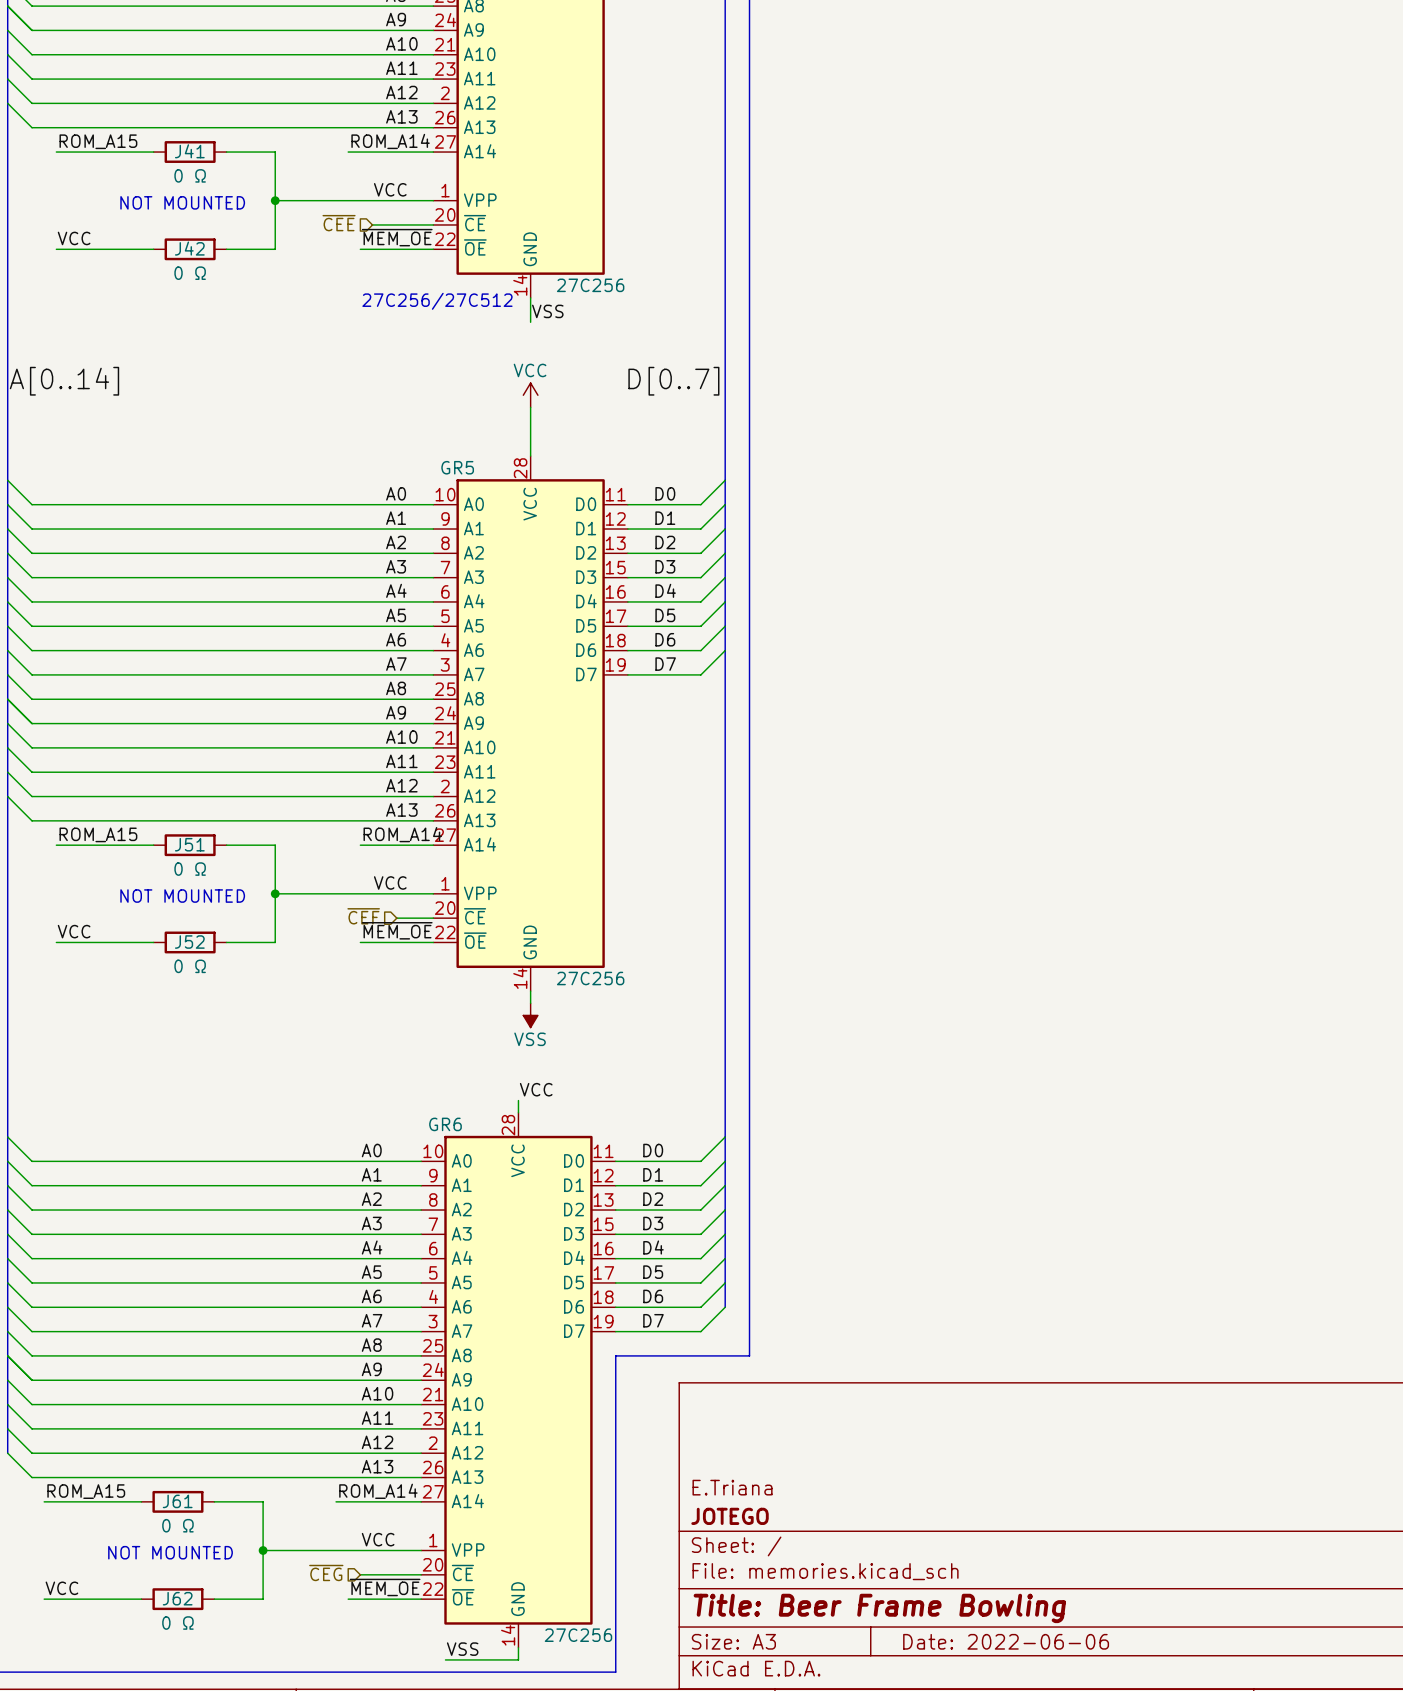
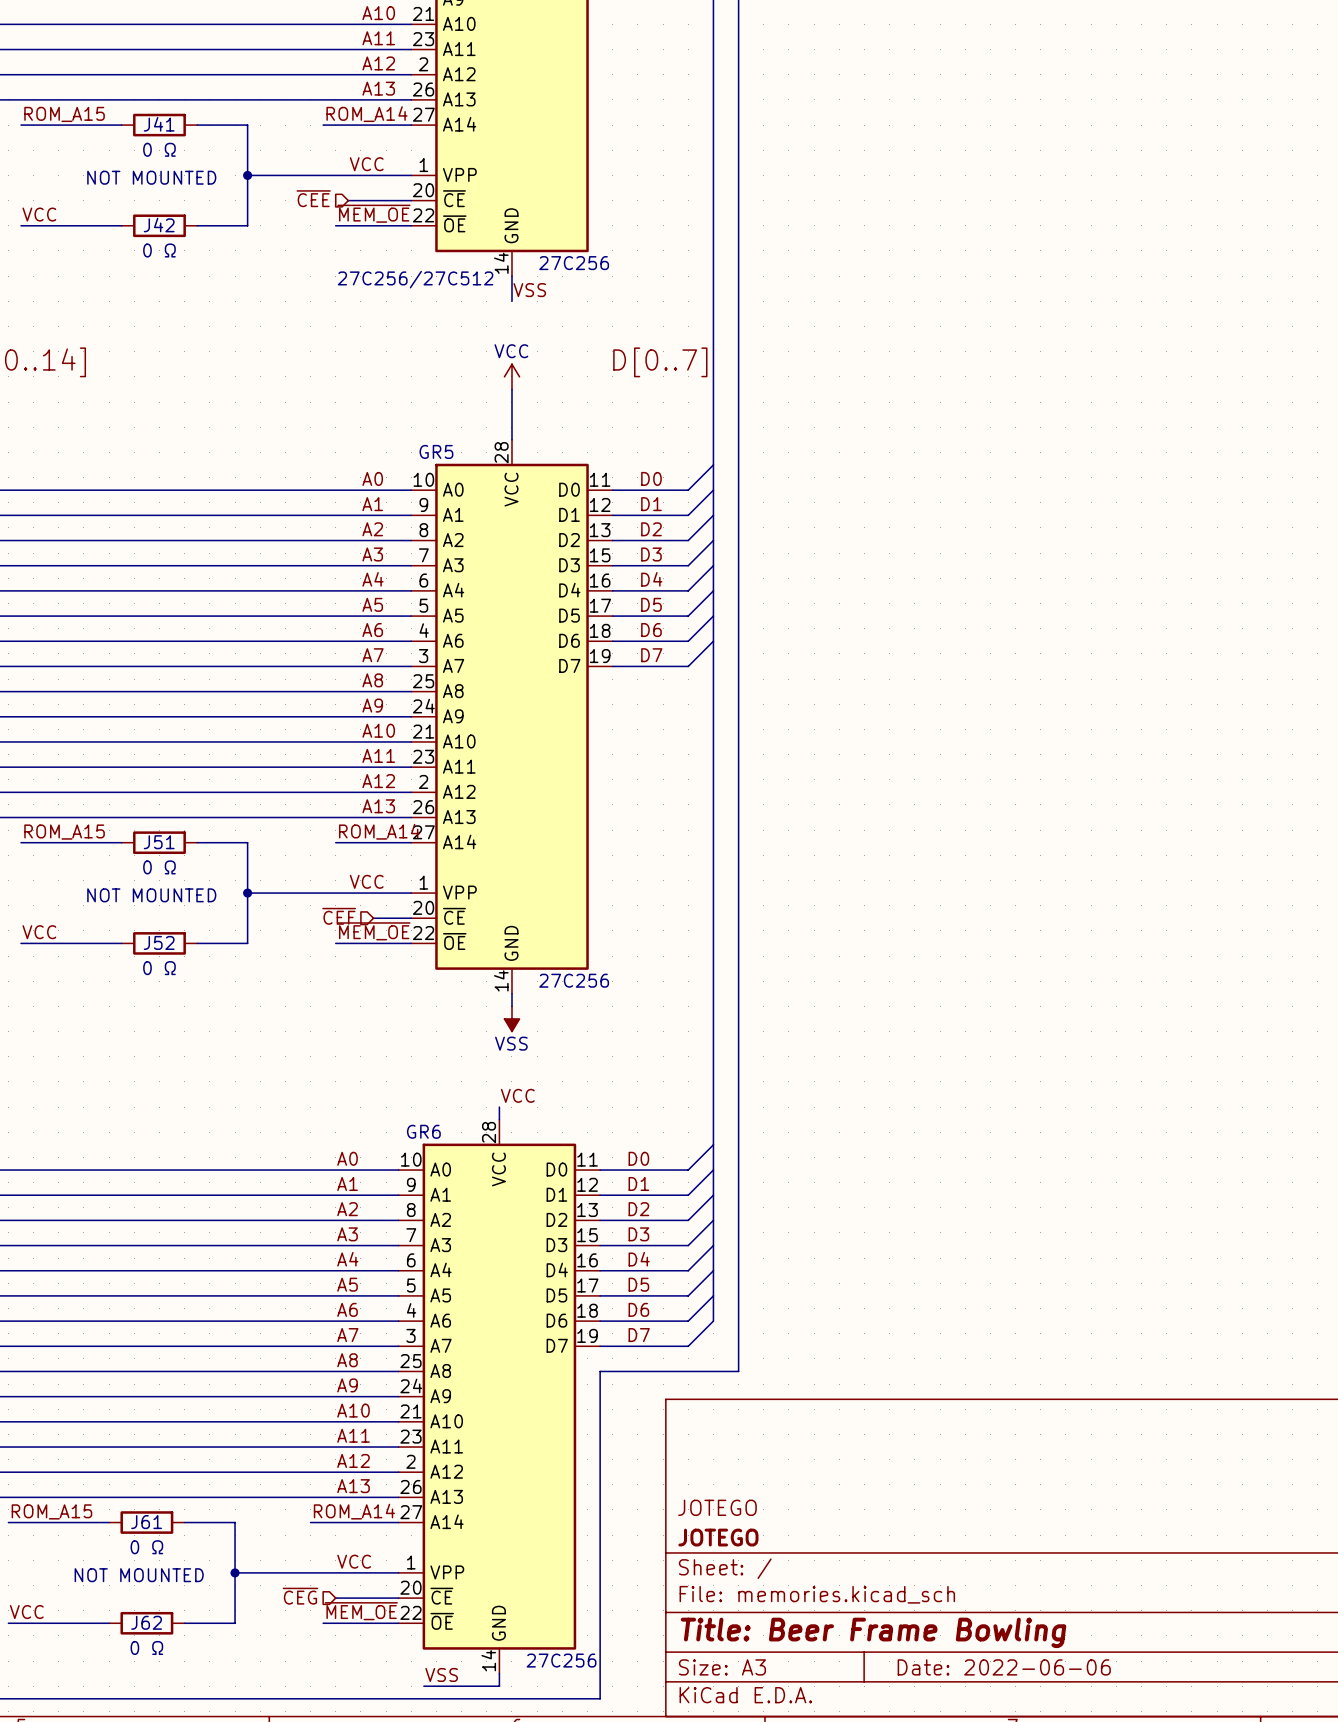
title block: E.Triana (732, 1487) -> JOTEGO (717, 1507)

